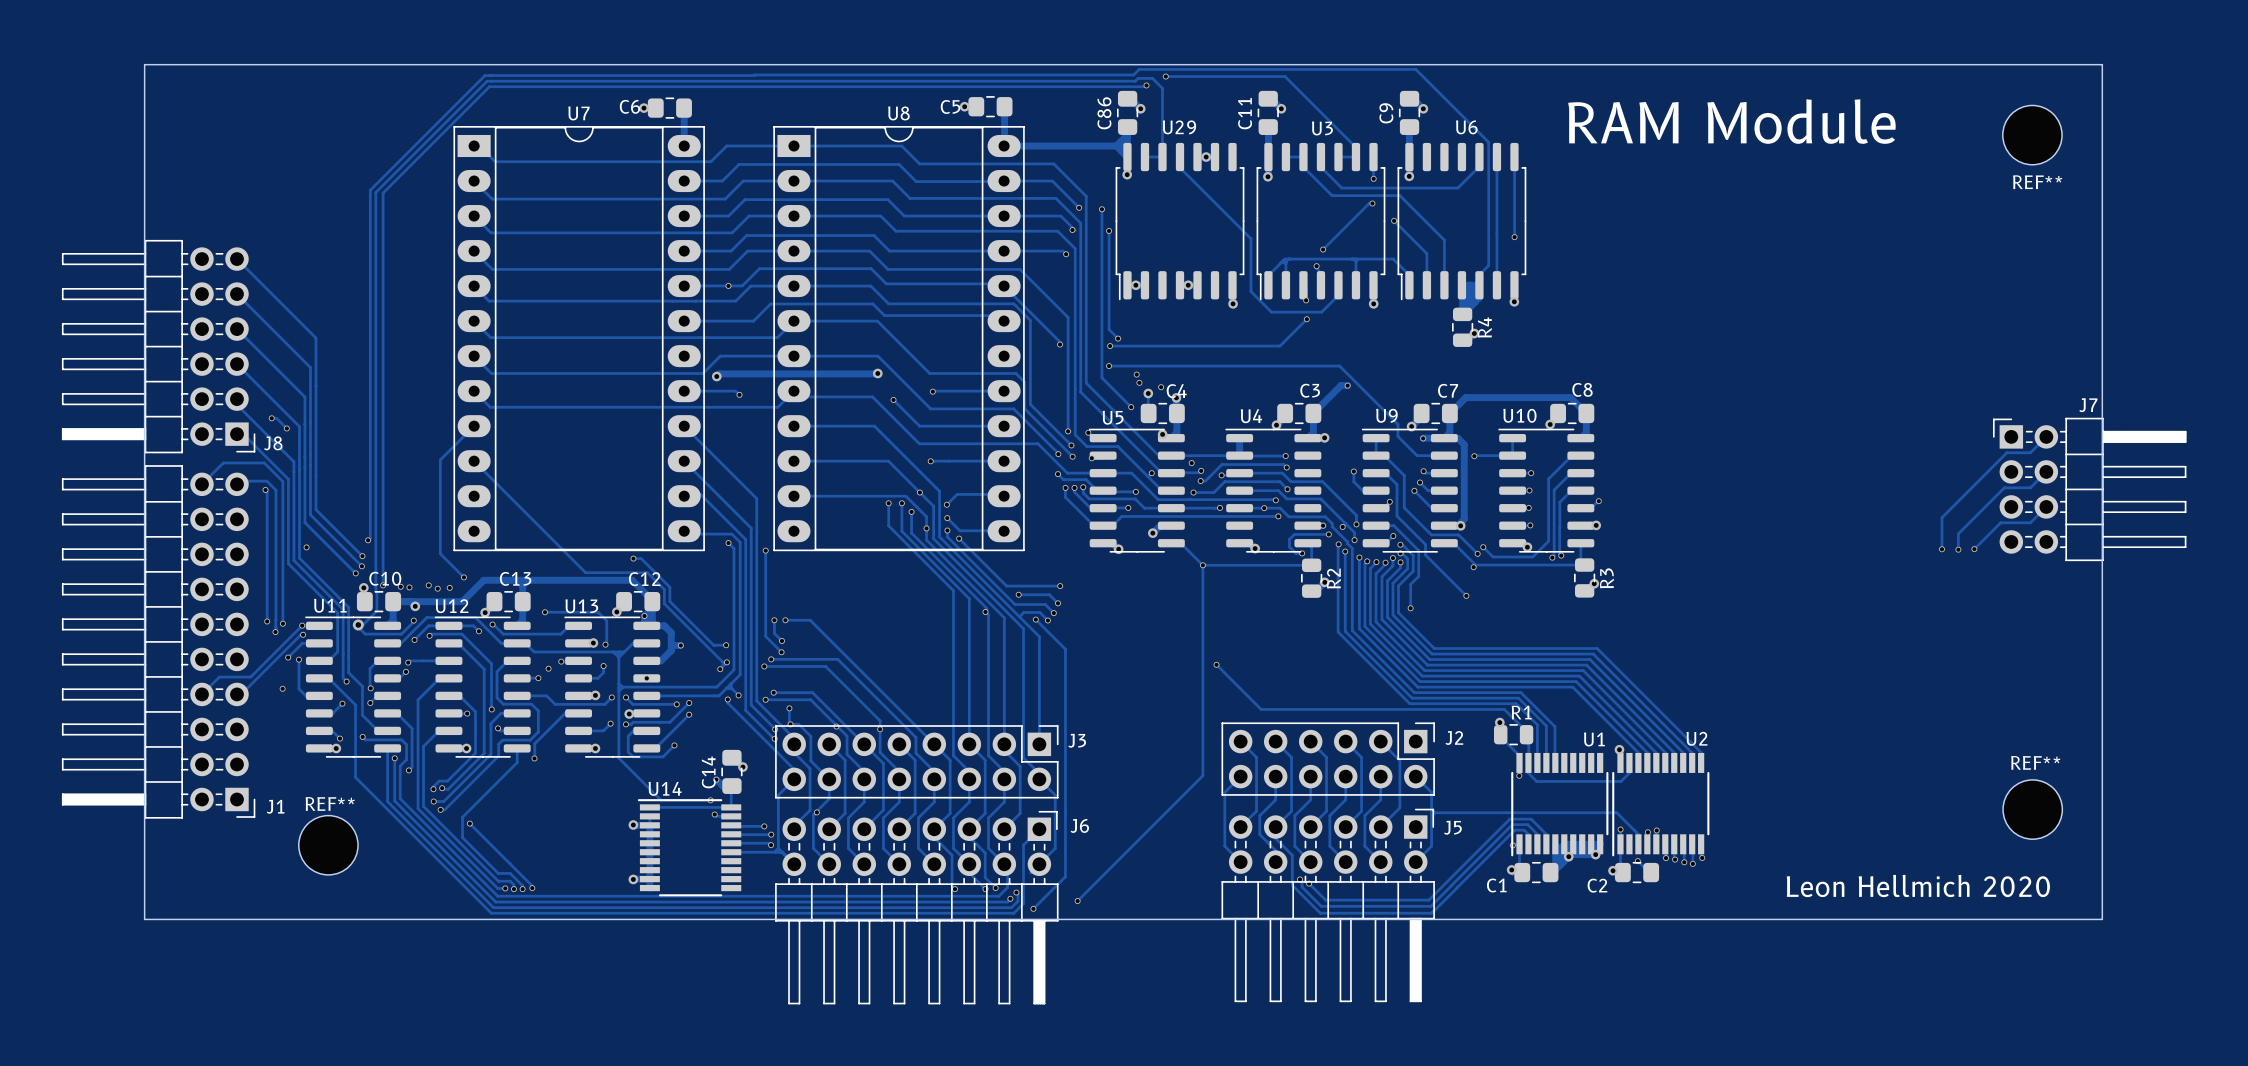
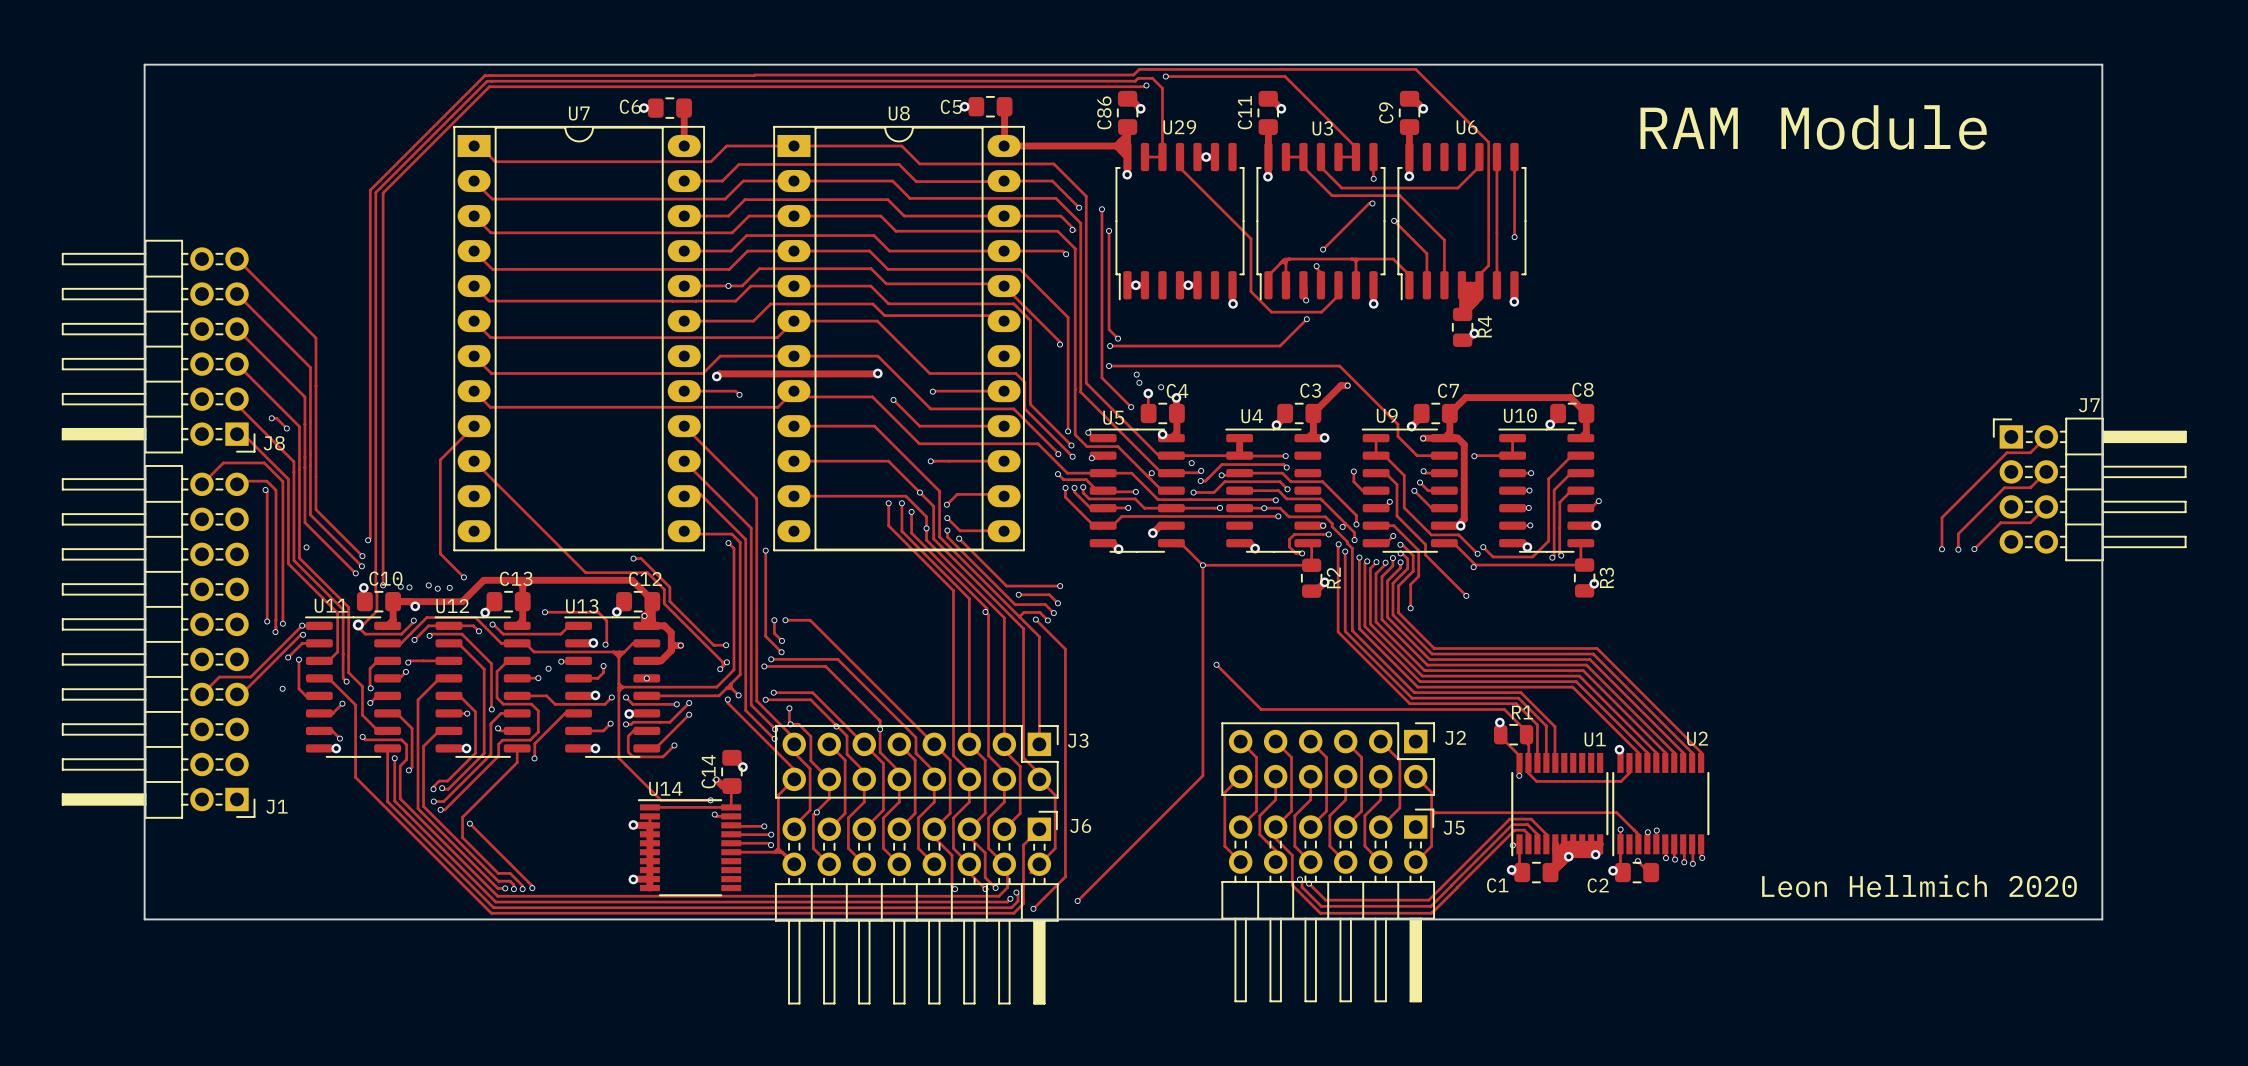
text position: RAM Module (1731, 121) -> RAM Module (1813, 127)
REF**: (2032, 135) -> none
REF**: (2032, 809) -> none
REF**: (328, 845) -> none

